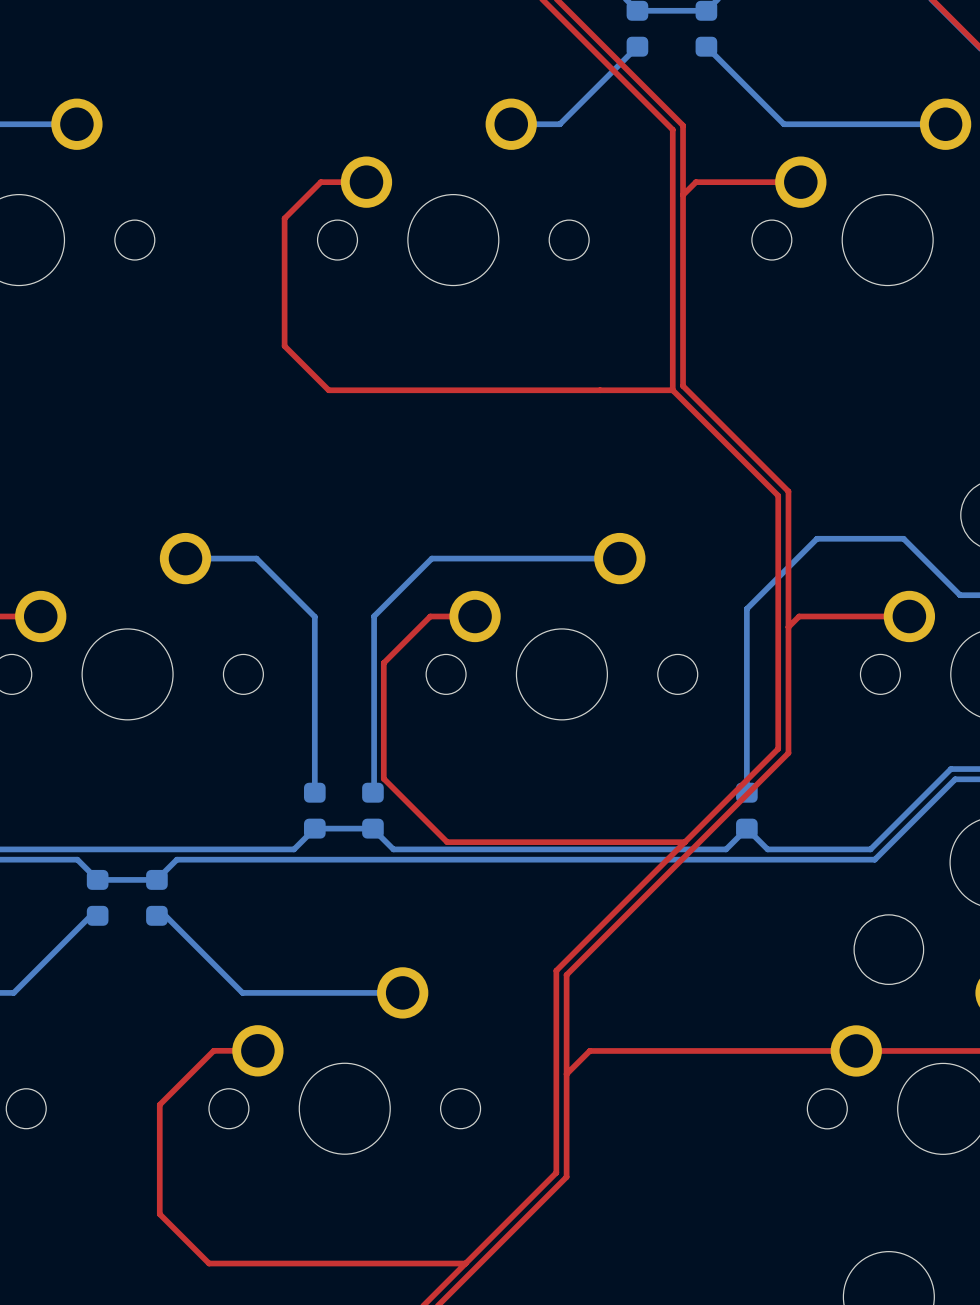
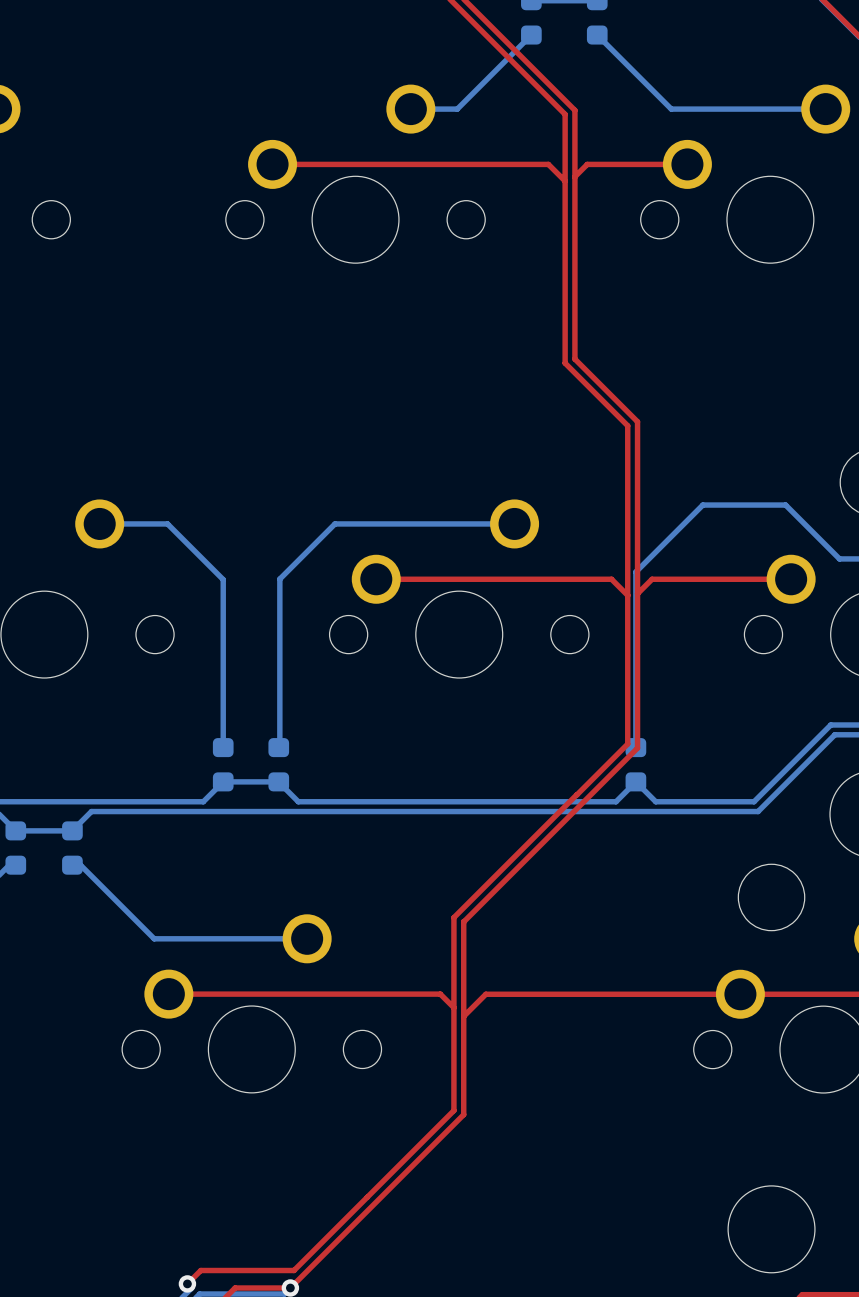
top track: (366, 182) (320, 182) (284, 218) (284, 346) (328, 390) (672, 390) -> (272, 164) (548, 164) (565, 181)
top track: (748, 451) (788, 491) (788, 753) (566, 974) -> (637, 421) (637, 748) (463, 921)
top track: (738, 455) (778, 495) (778, 748) (684, 842) (447, 842) (383, 778) (383, 663) (430, 616) (475, 616) -> (627, 595) (611, 579) (376, 579)
top track: none -> (627, 425) (627, 744) (576, 794)
top track: (799, 616) (788, 627) -> (685, 579) (652, 579) (637, 593)
top track: (257, 1050) (213, 1050) (159, 1104) (159, 1214) (209, 1263) (465, 1263) -> (168, 994) (440, 994) (453, 1007)

